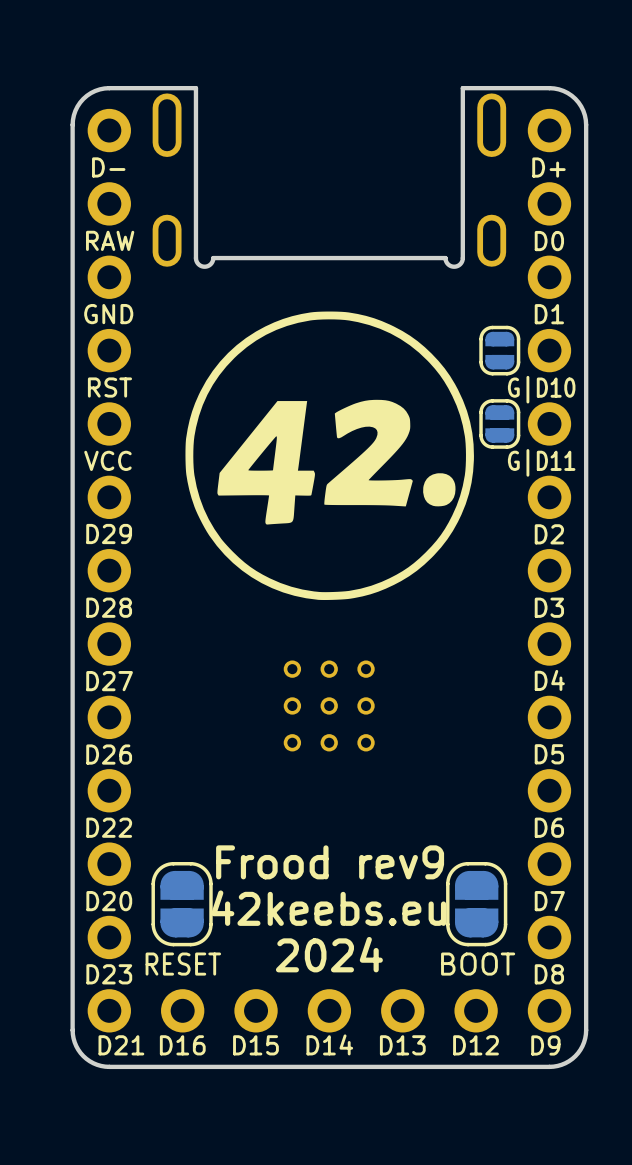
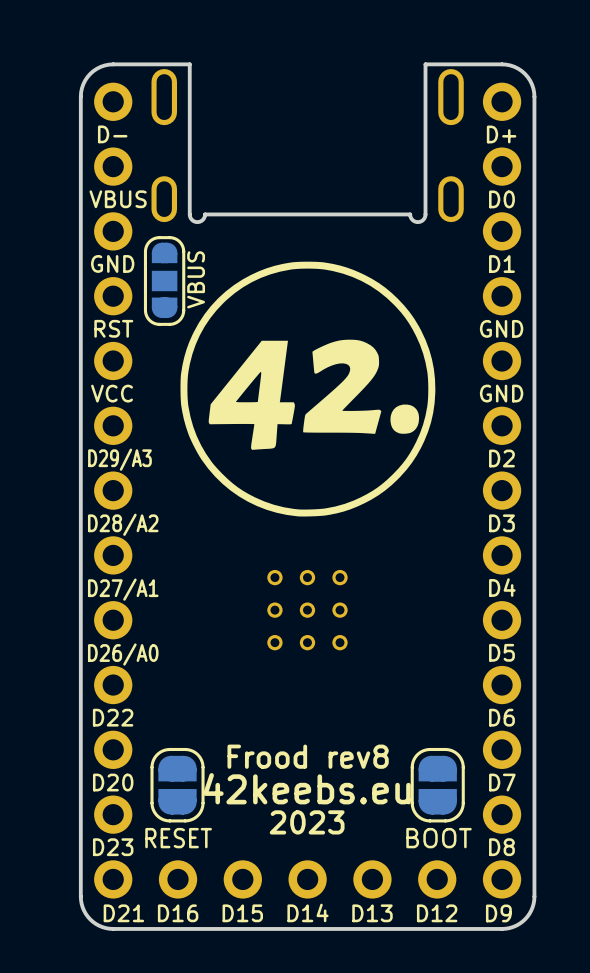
part footprint: [87, 108, 572, 1033] -> [94, 82, 522, 899]
part: none -> (164, 281)
part: (499, 350) -> none
part: (499, 423) -> none
text: Frood rev9 (330, 862) -> Frood rev8 (308, 756)
text: 2024 (329, 954) -> 2023 (307, 822)

